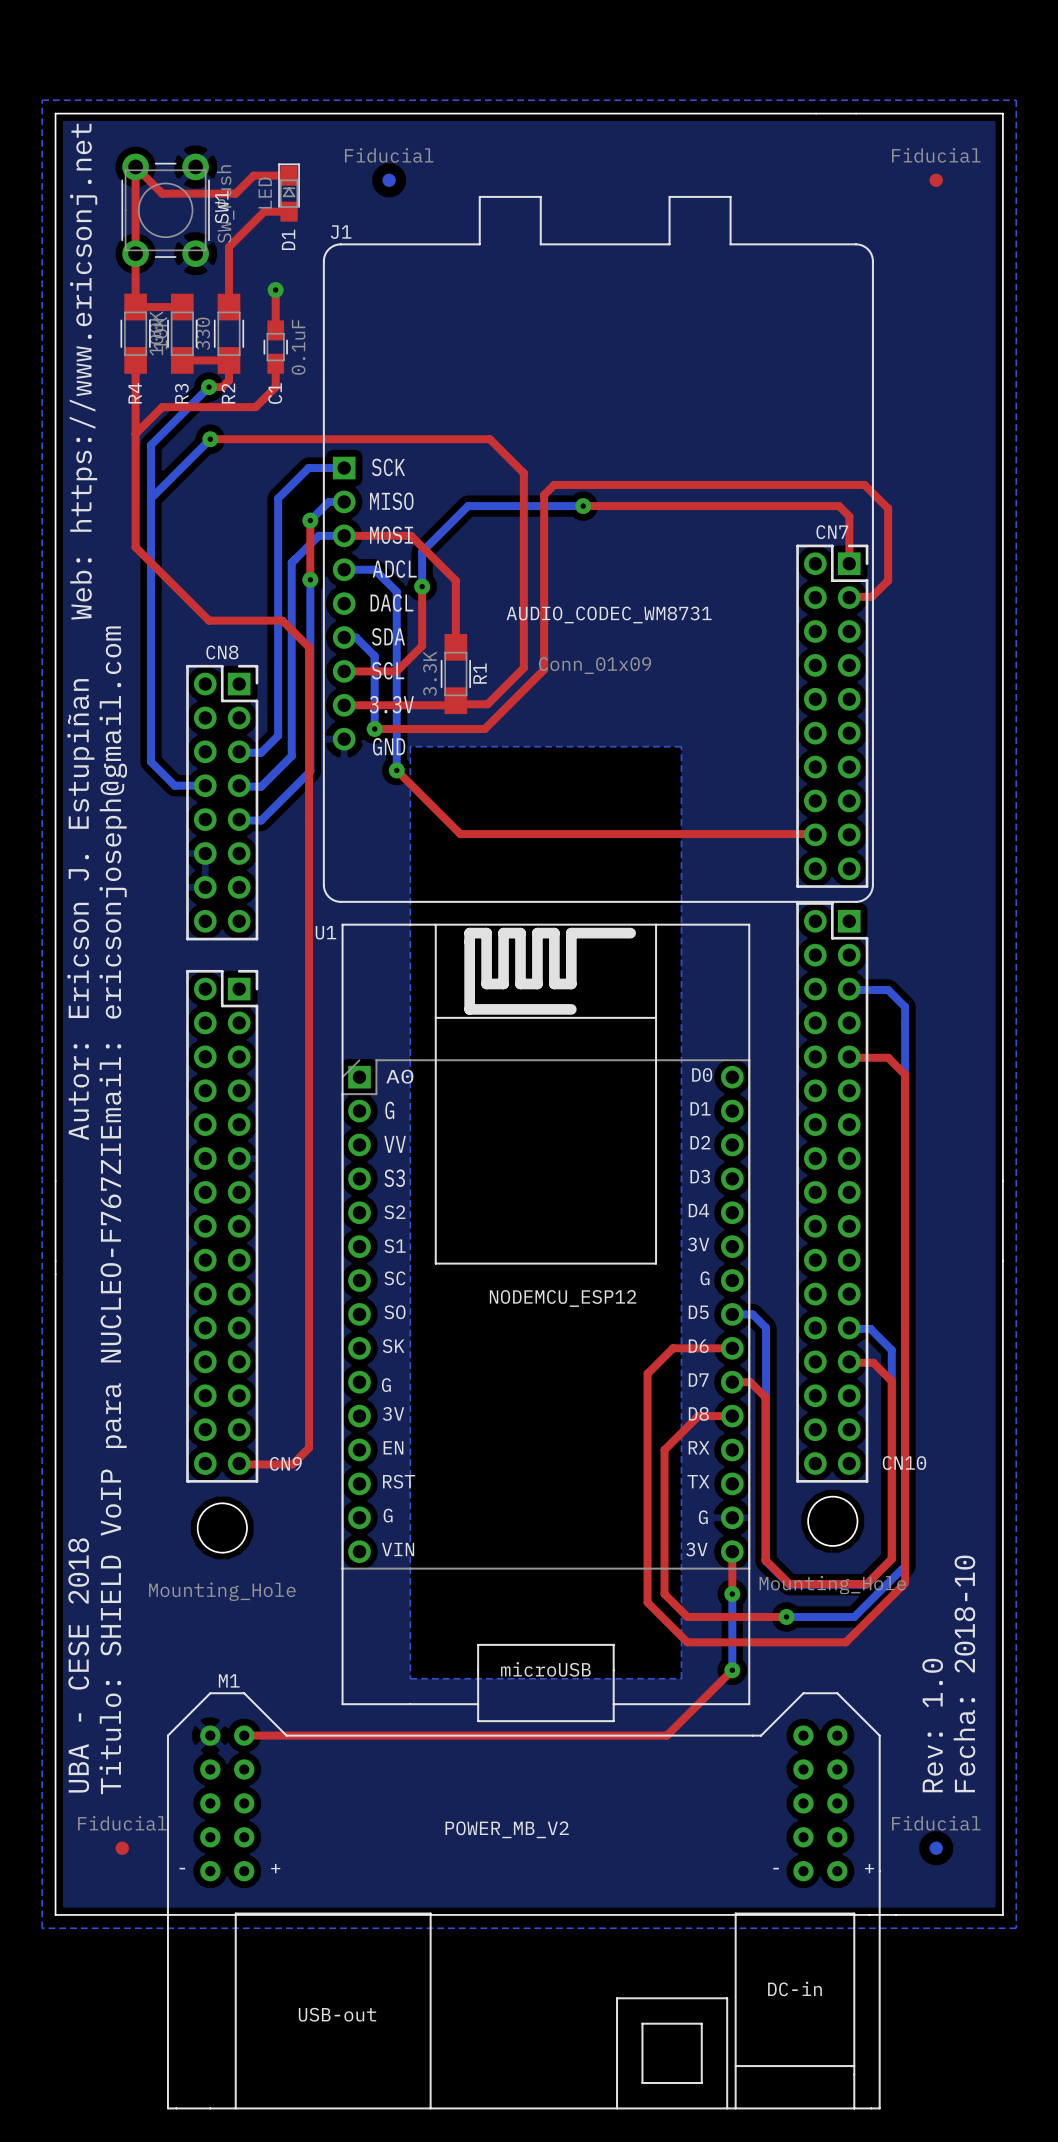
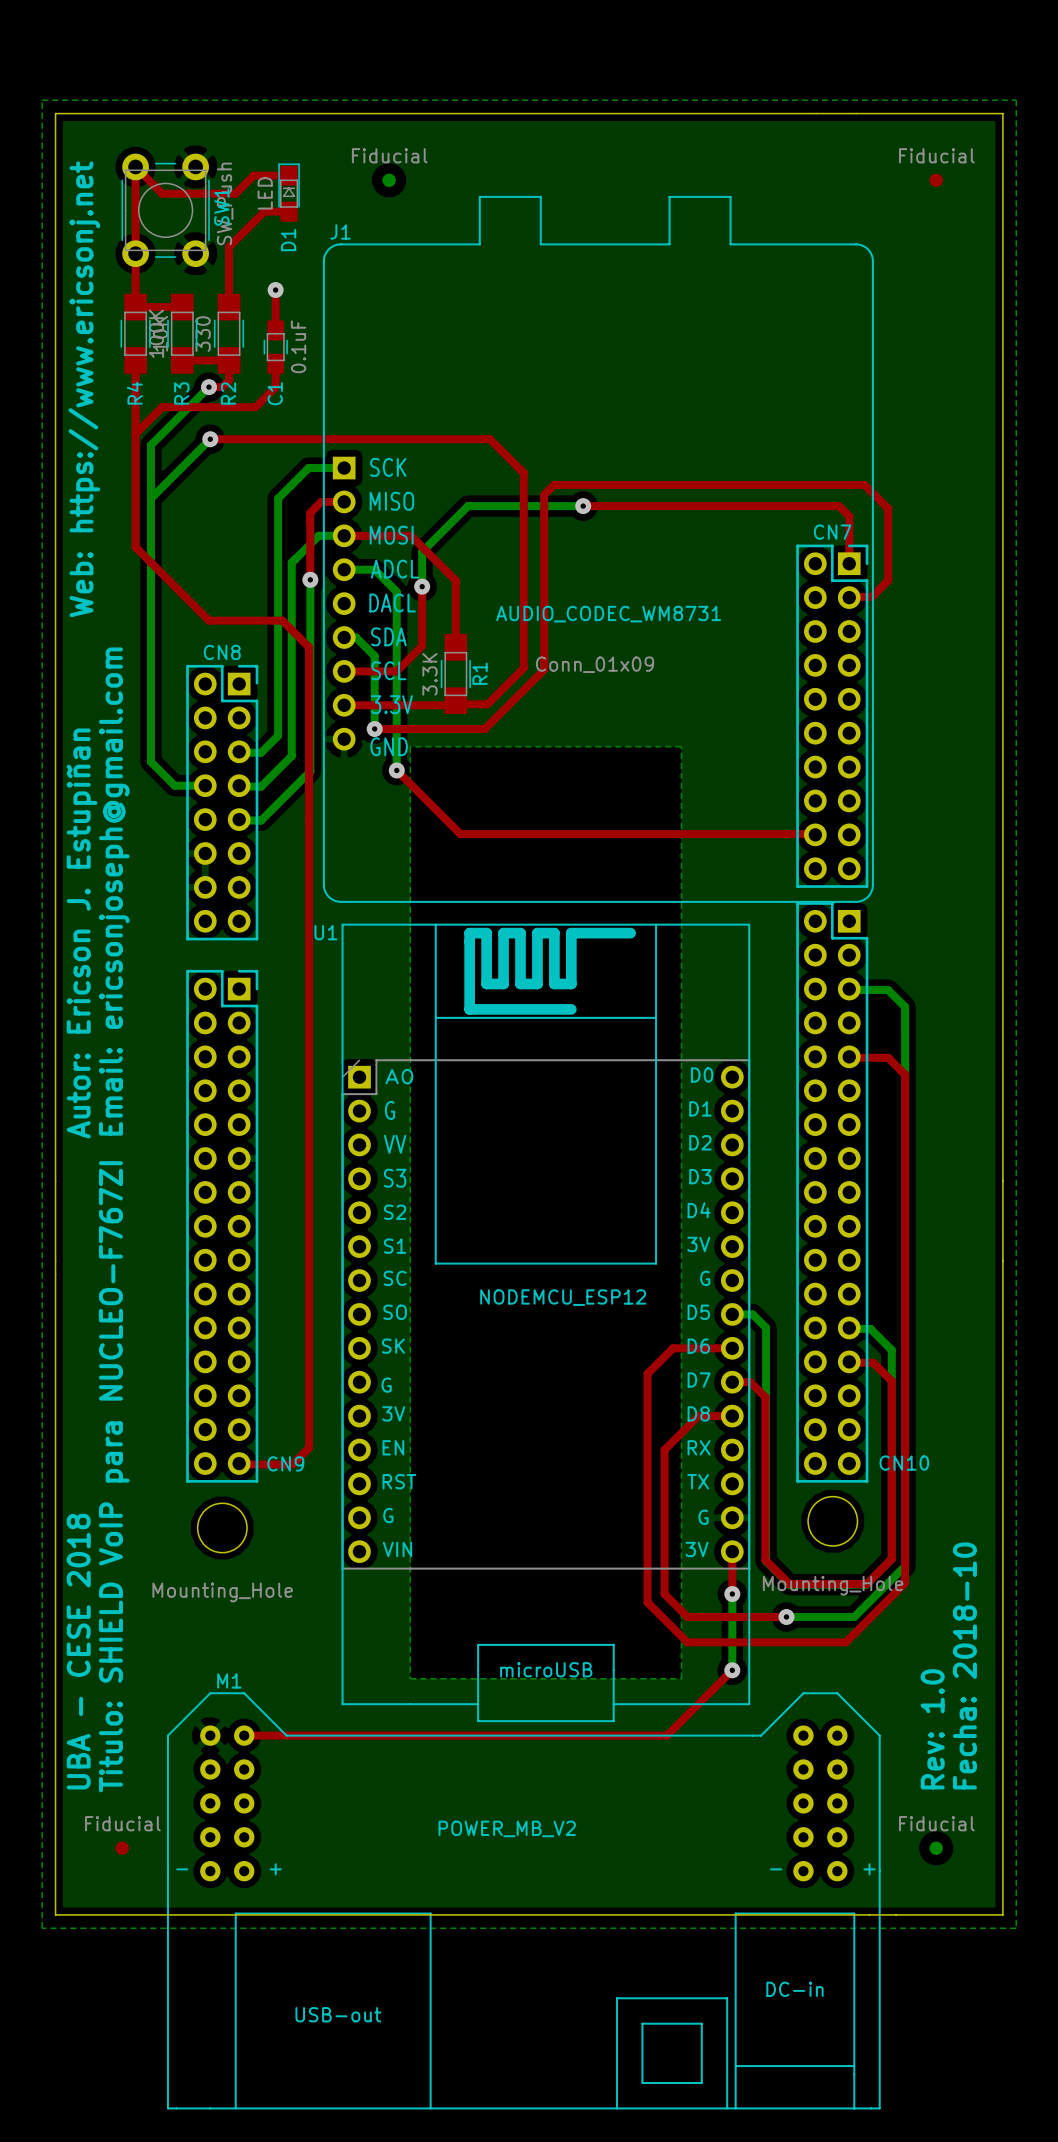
top track: none -> (344, 501) (321, 501) (310, 512) (310, 520)
bottom track: (344, 501) (328, 501) (310, 520) -> none
via: (310, 520) -> none

